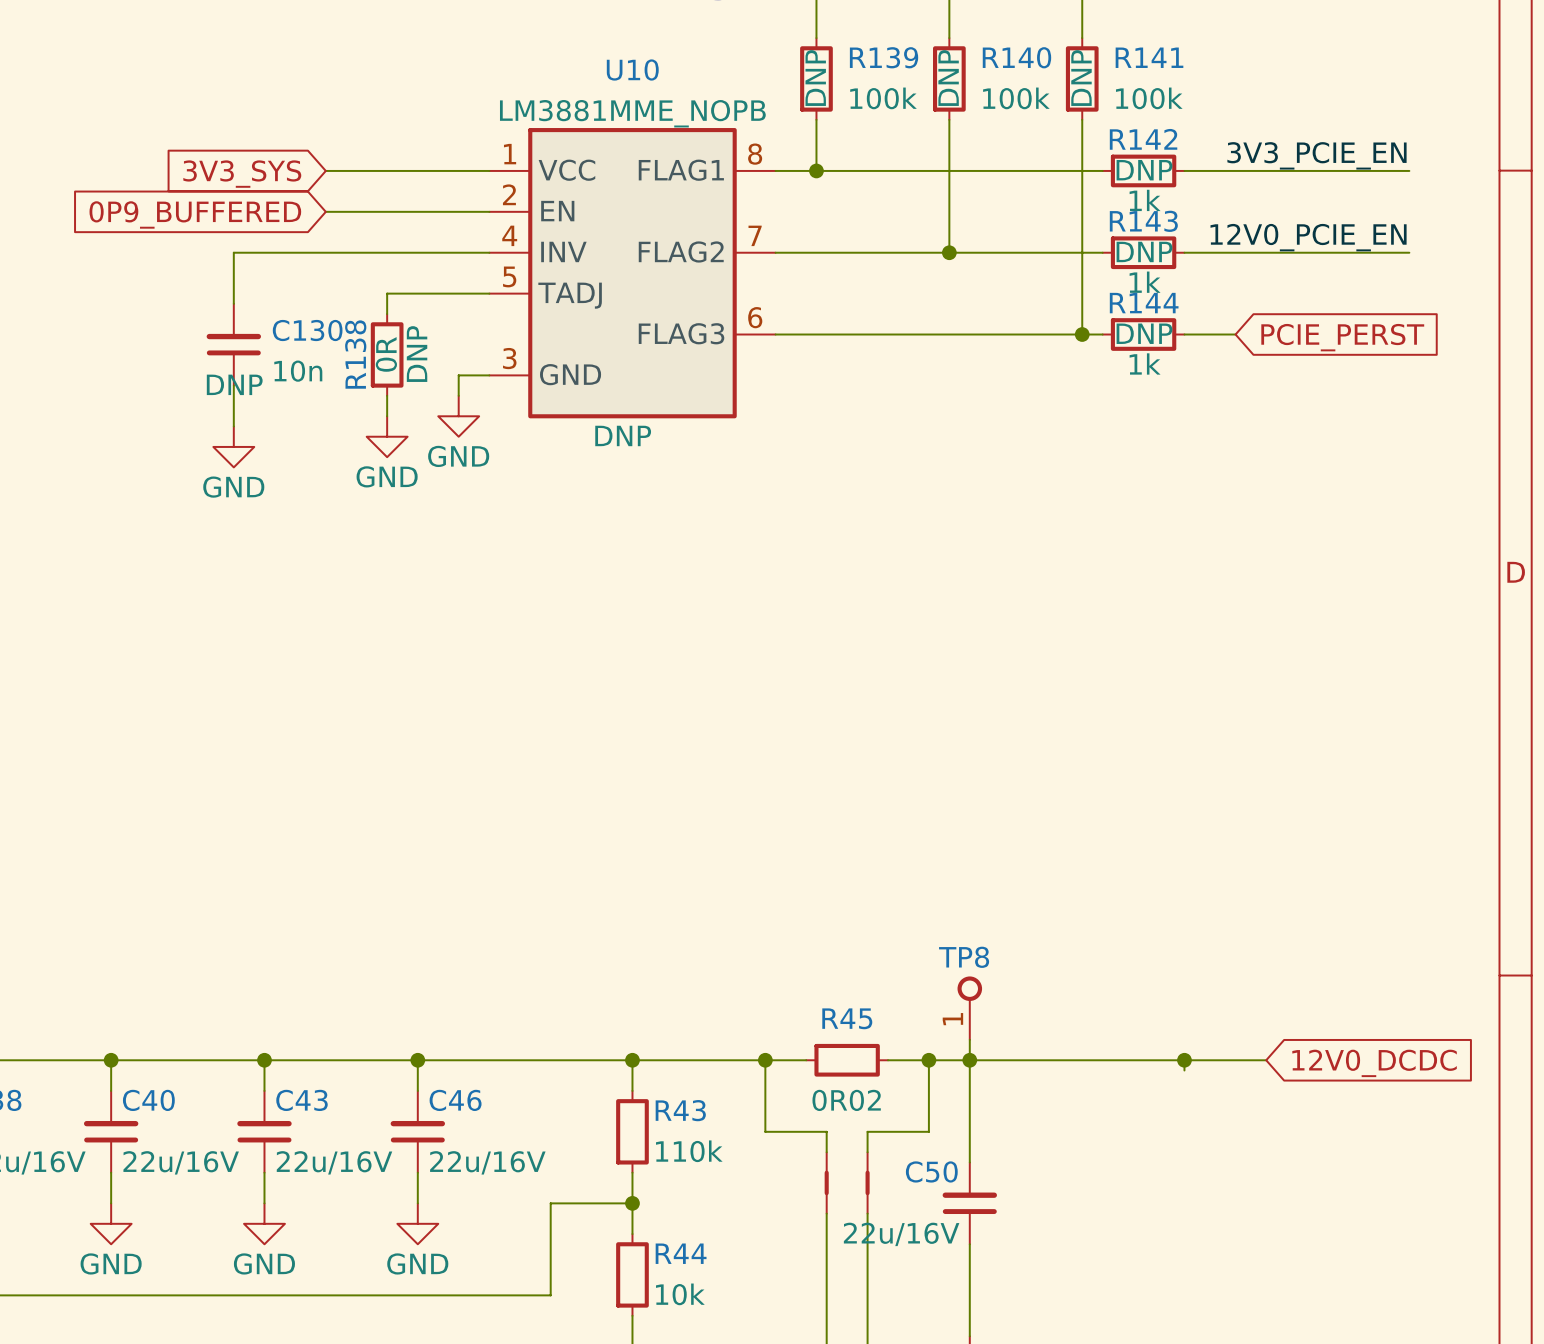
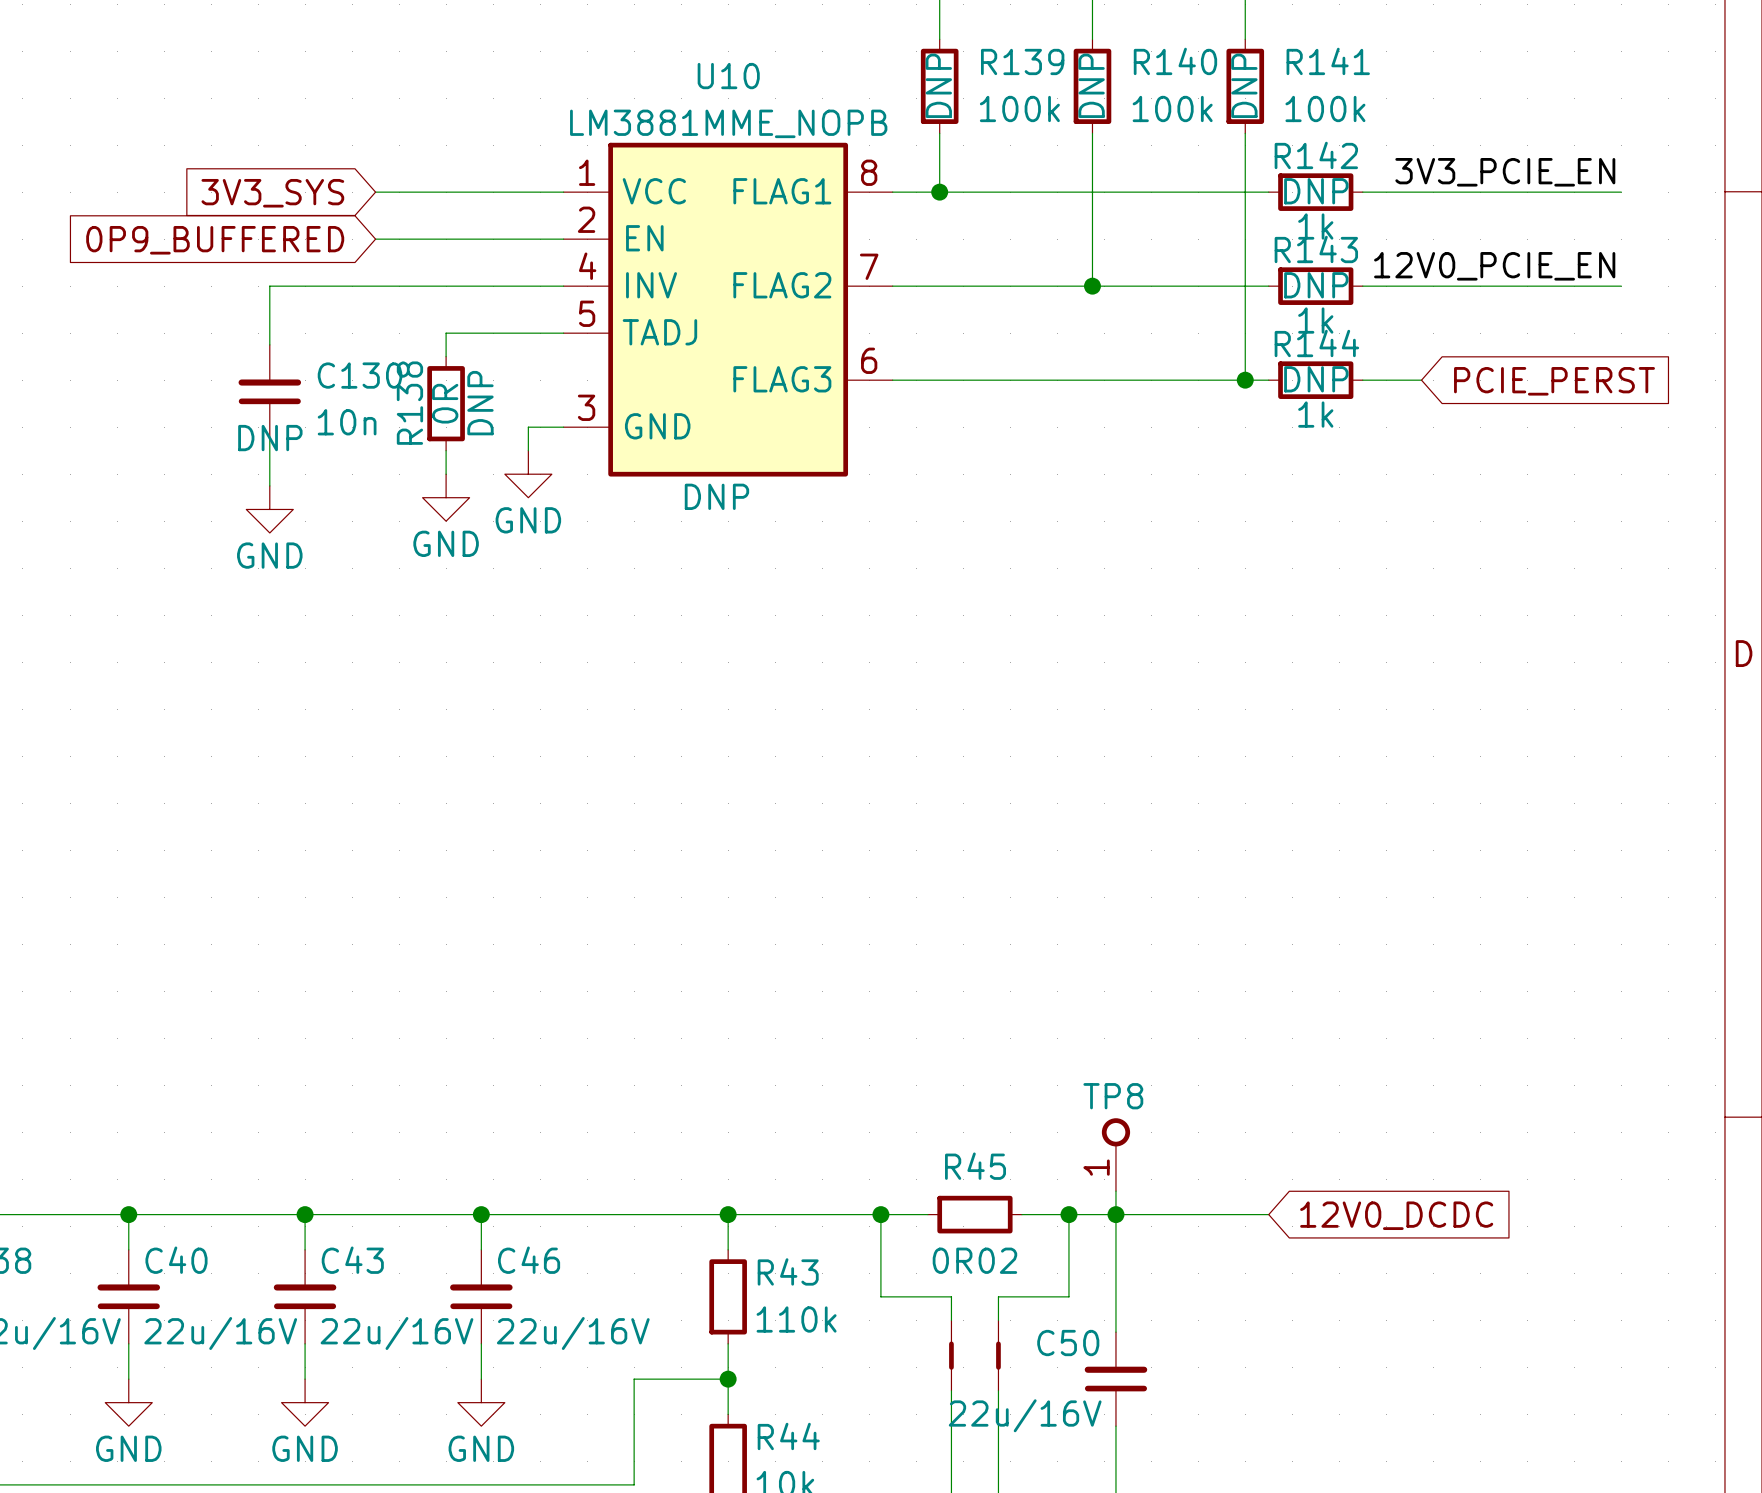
wire: (1102, 1060) (1266, 1060) -> none
junction: (1184, 1060) -> none
global label position: 12V0_DCDC (1374, 1063) -> 12V0_DCDC (1396, 1215)

